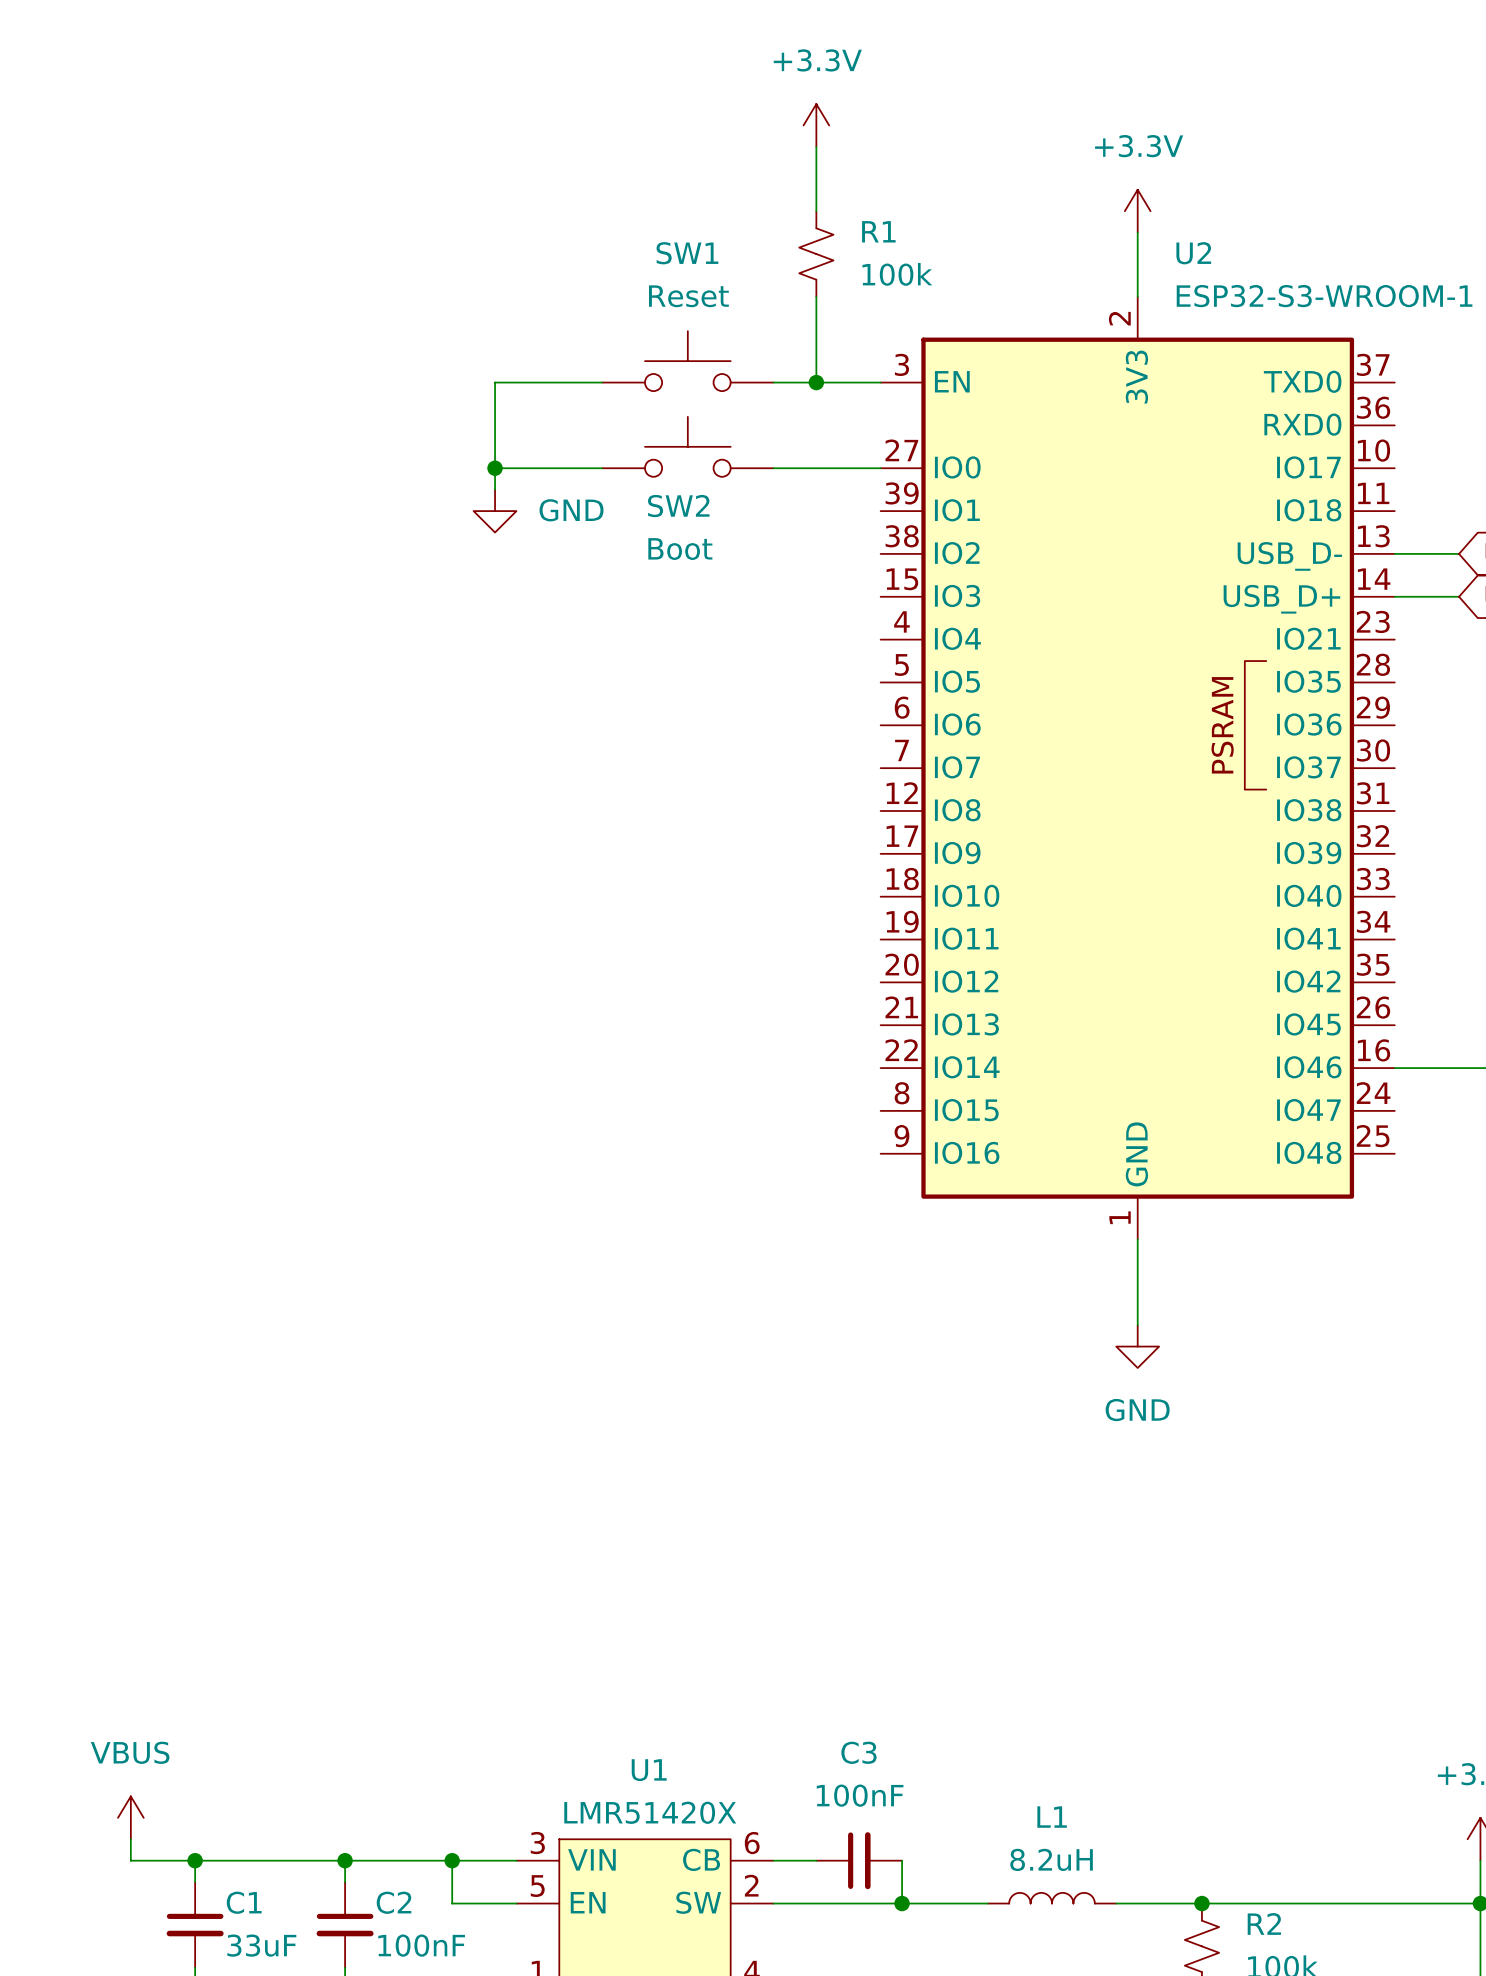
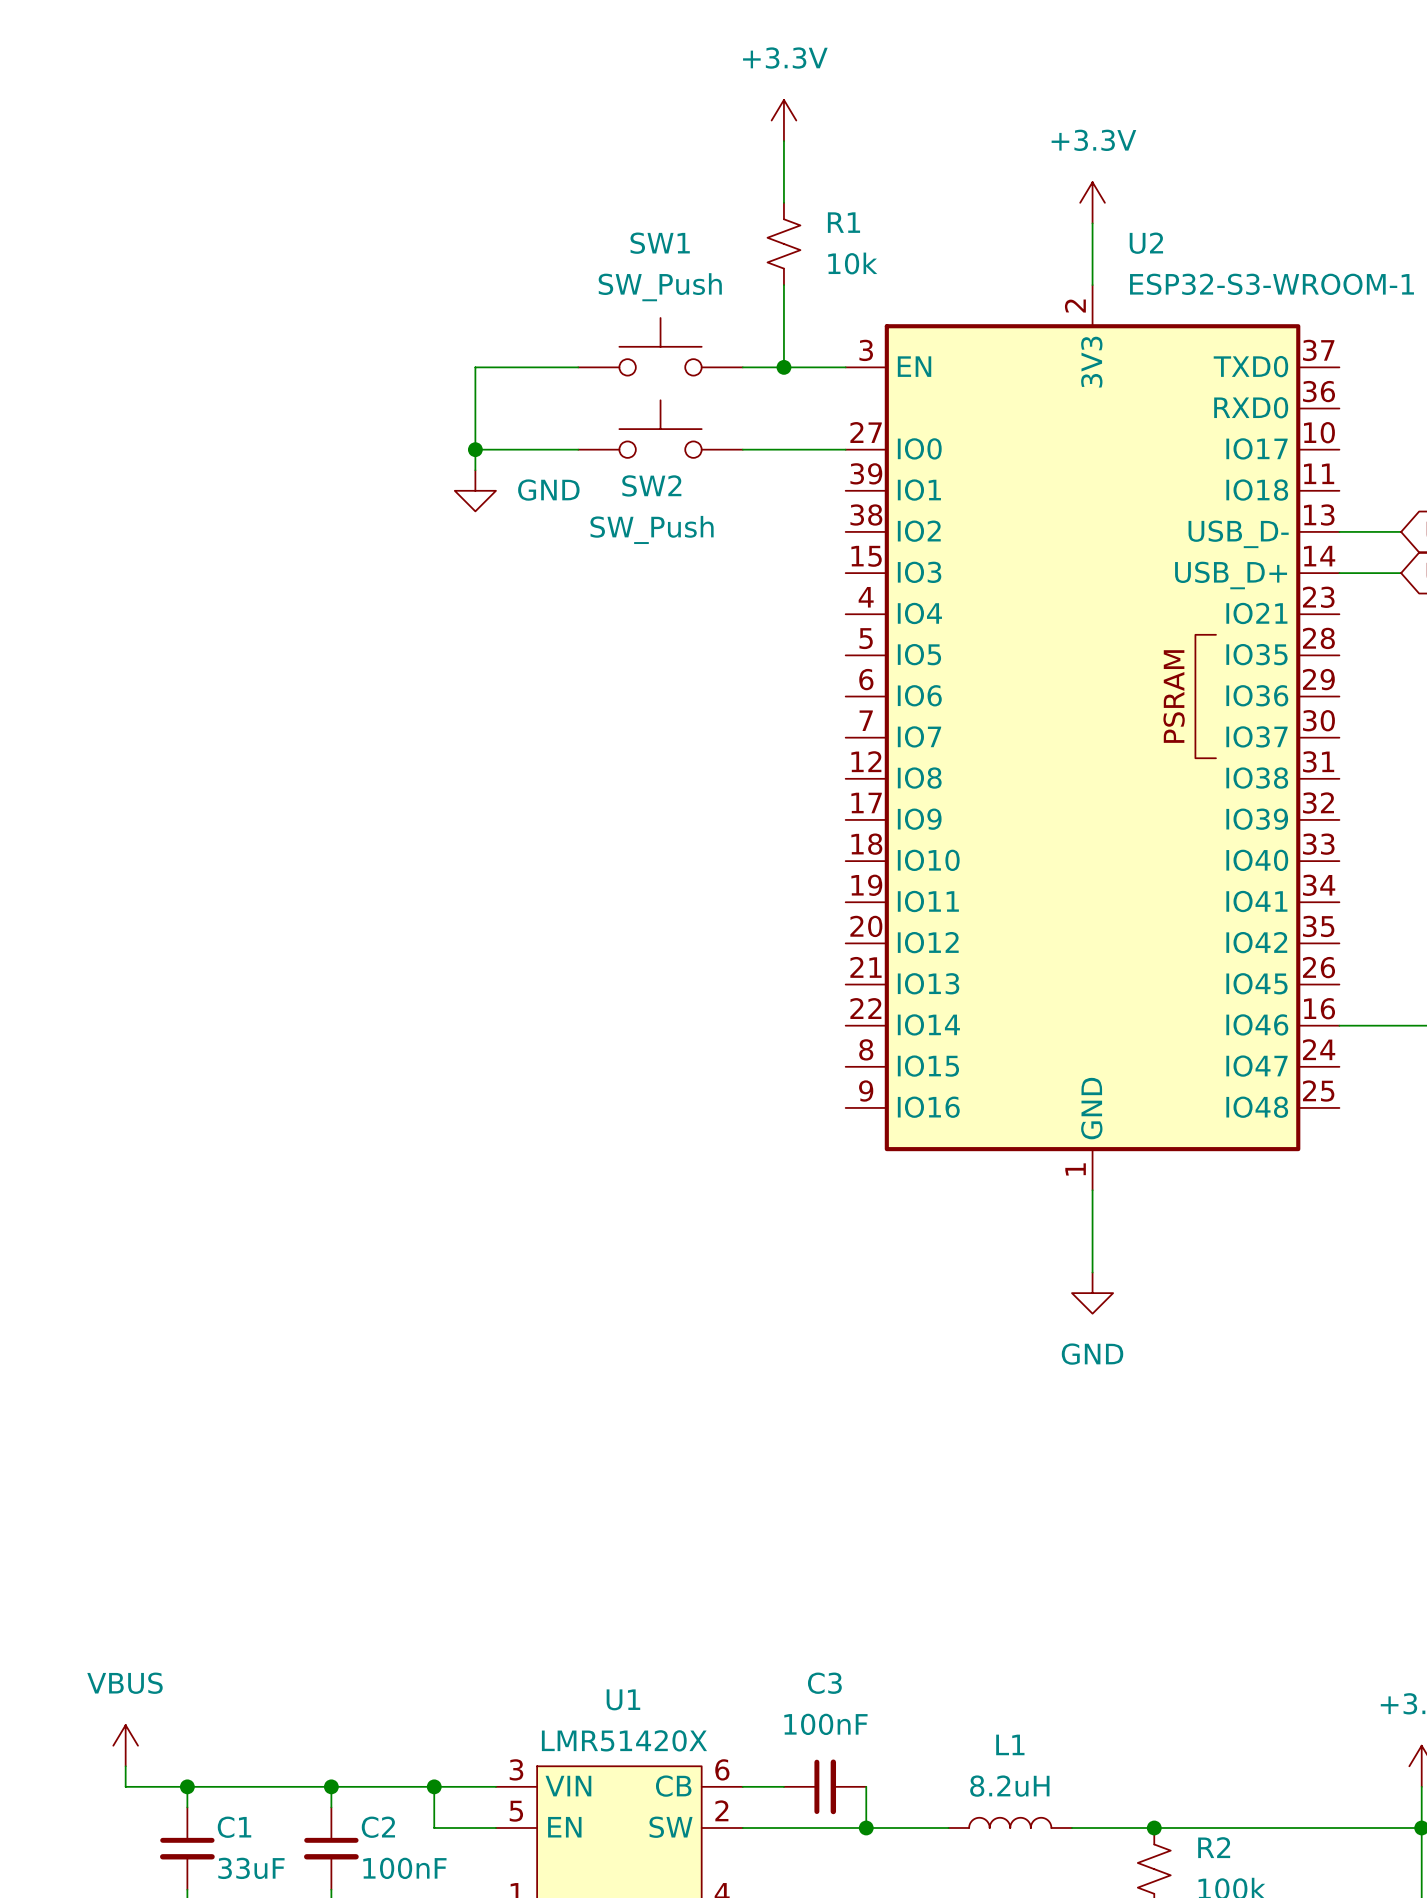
R1 value: 100k (897, 274) -> 10k (852, 263)
SW1 value: Reset (688, 296) -> SW_Push (660, 287)
SW2 value: Boot (680, 549) -> SW_Push (652, 529)

